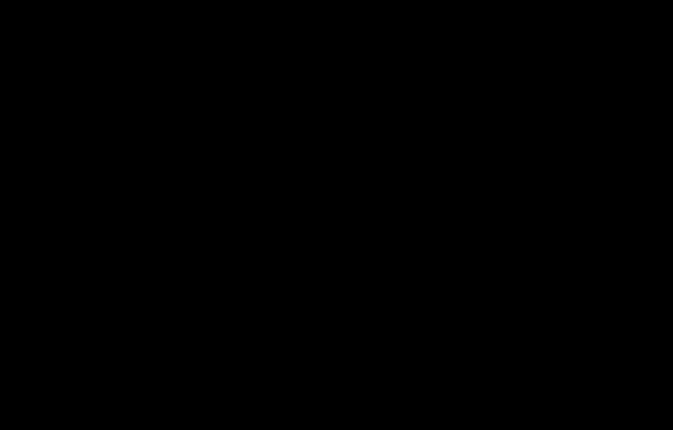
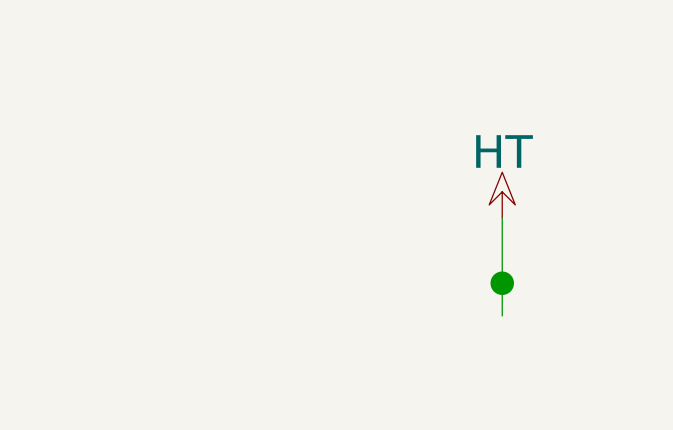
power symbol: none -> HT (502, 195)
wire: none -> (502, 217) (502, 315)
junction: none -> (502, 283)

